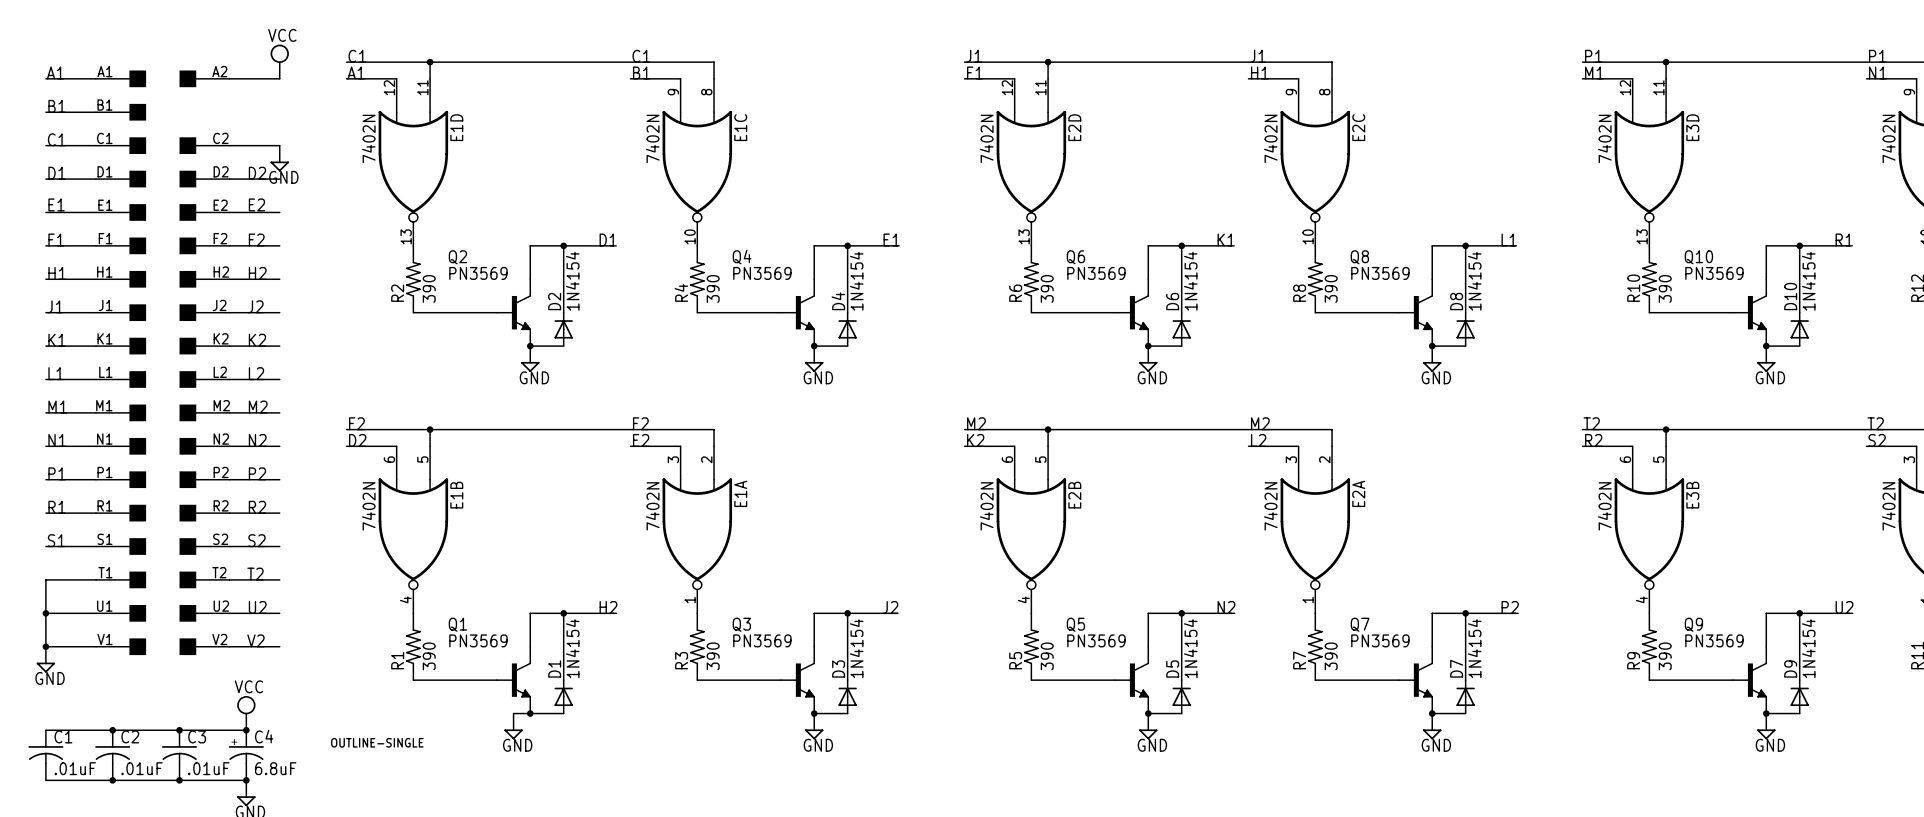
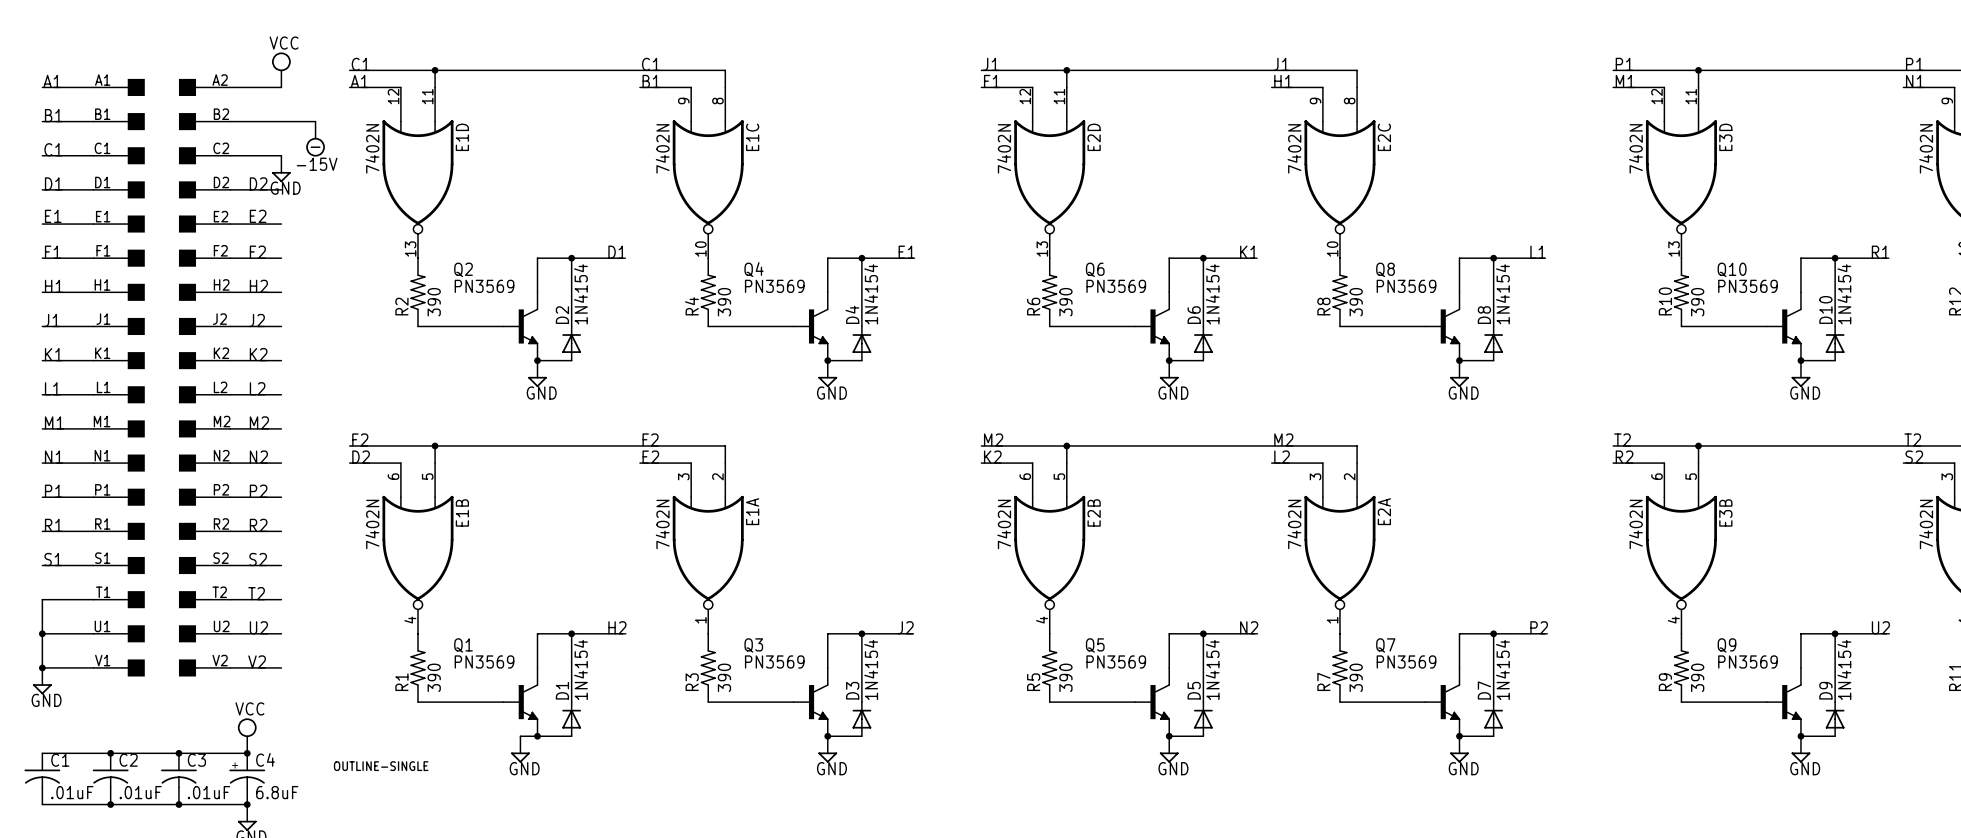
part: none -> (204, 121)
wire: none -> (230, 121) (315, 121)
power symbol: none -> -15V (315, 139)

